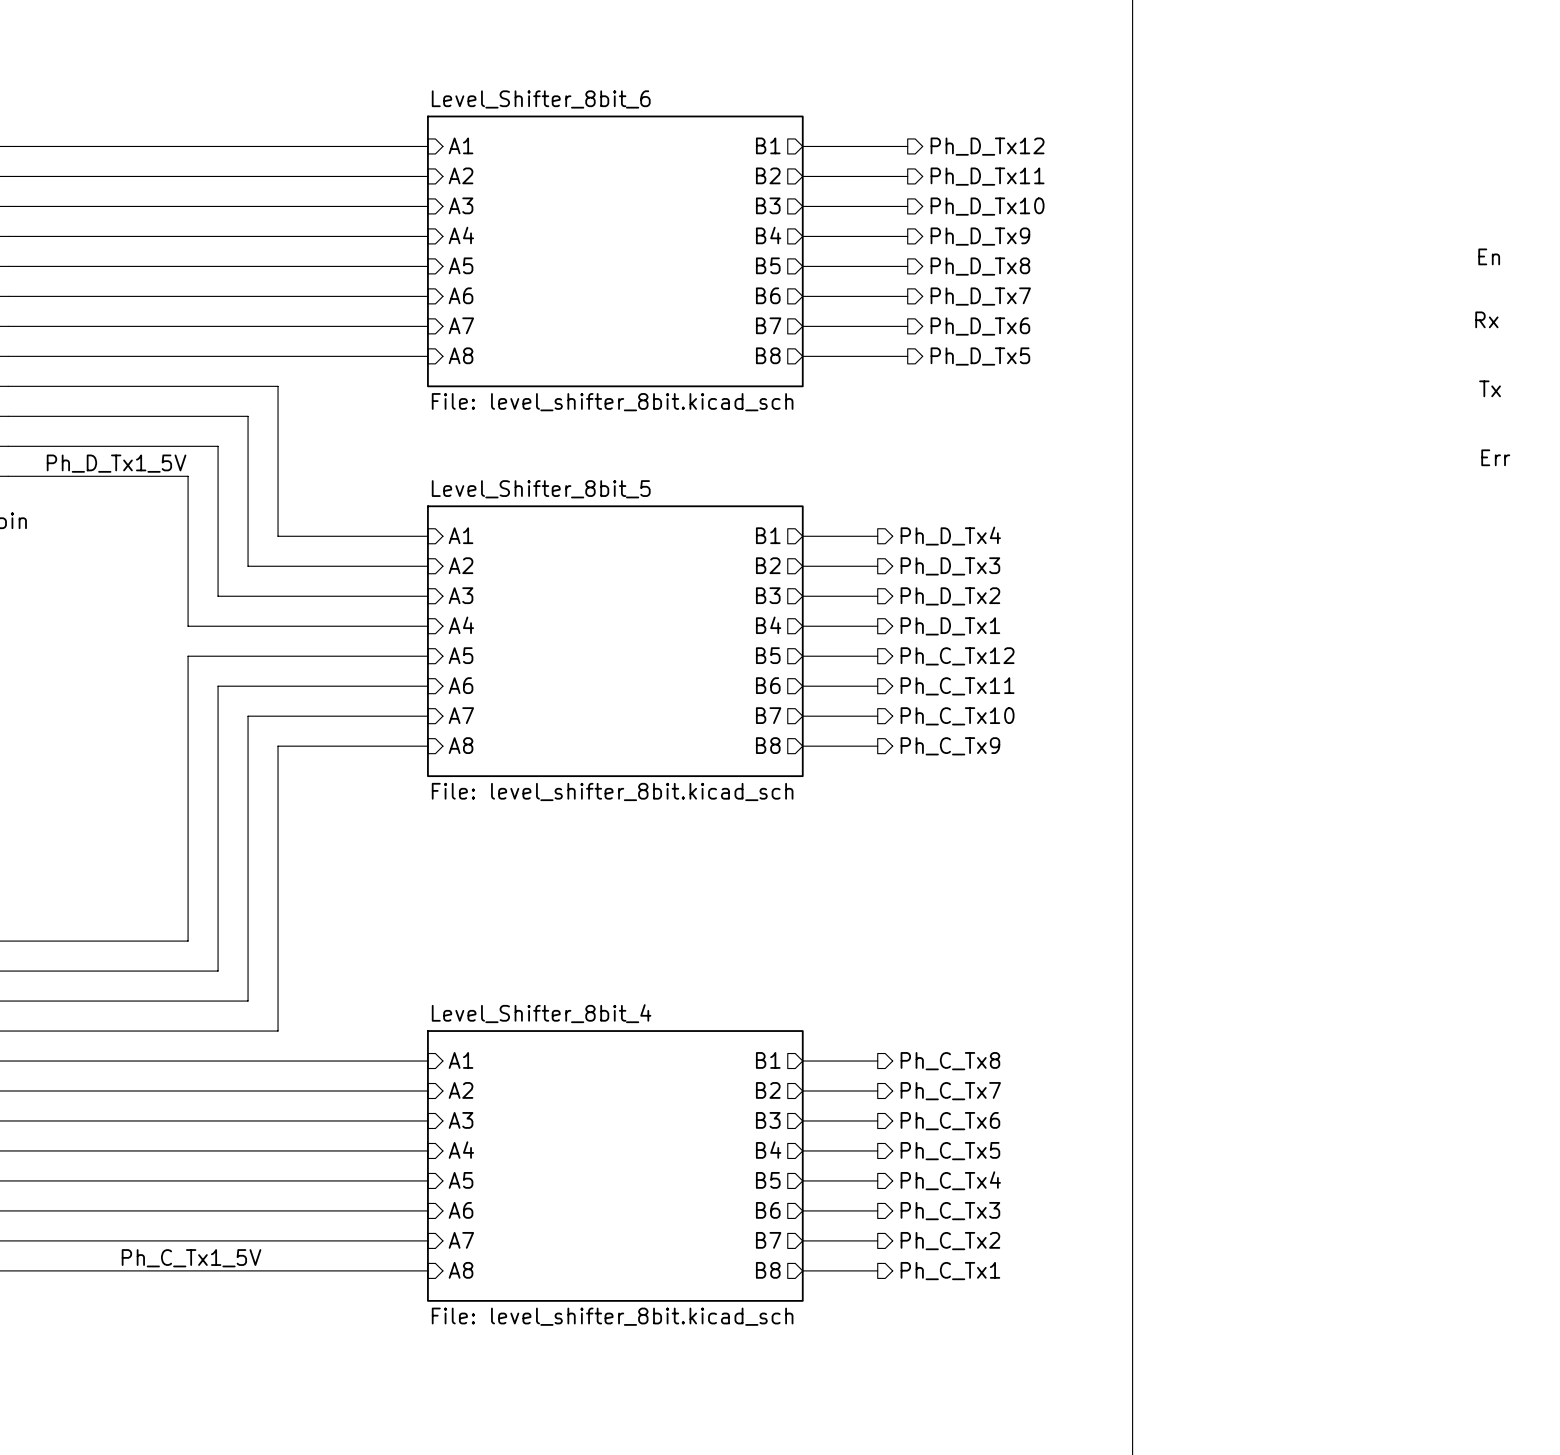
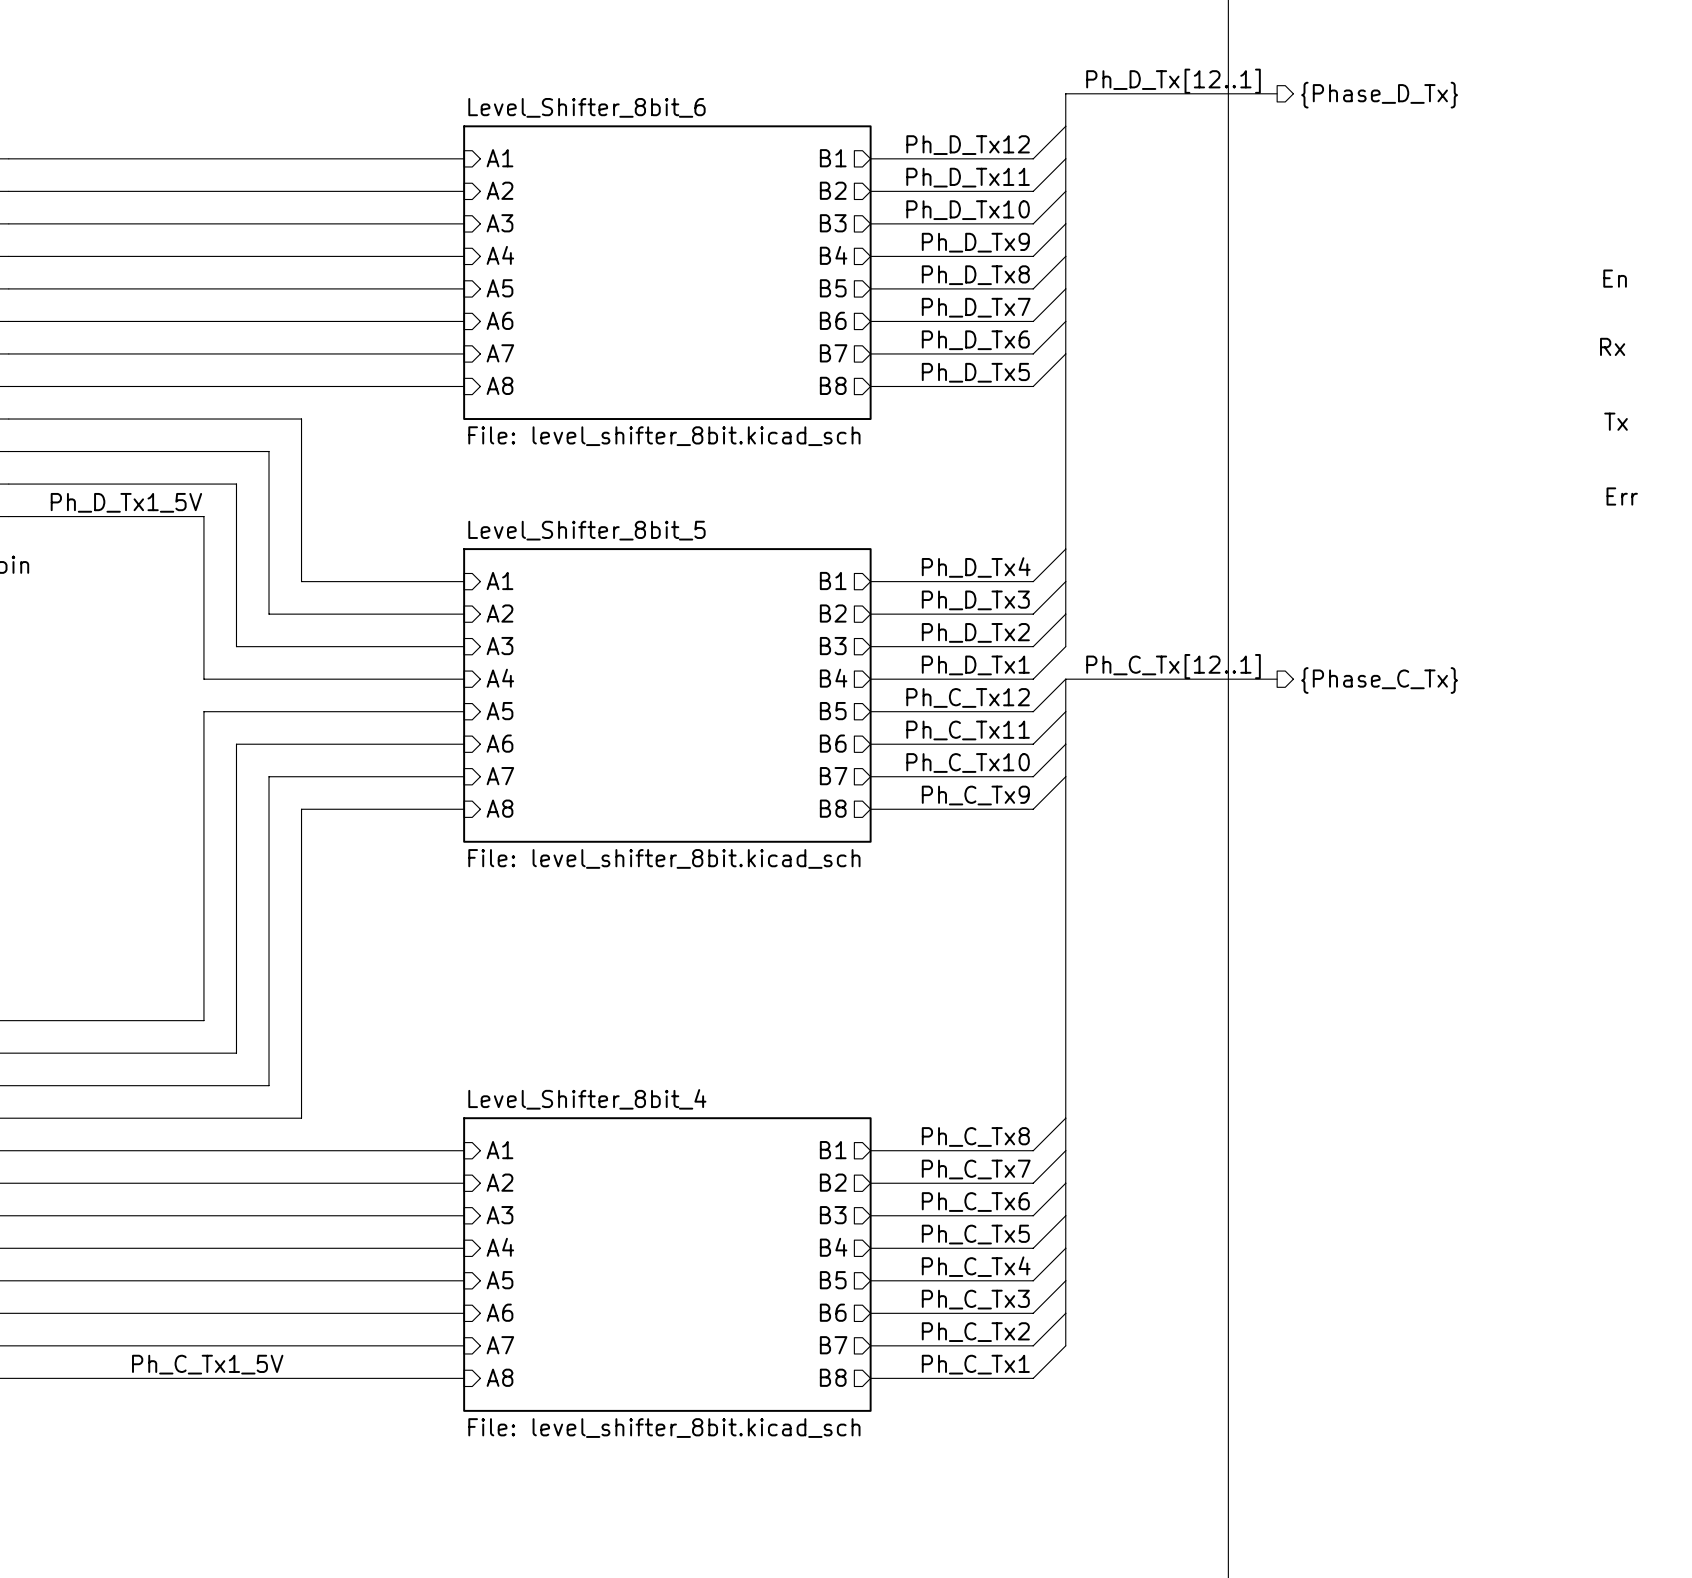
label: none -> Ph_D_Tx[12..1] (1173, 81)
bus: none -> (1277, 93) (1065, 93) (1065, 646)
hierarchical label: none -> {Phase_D_Tx} (1379, 95)
wire: none -> (1065, 126) (1033, 158) (984, 158)
label: none -> Ph_D_Tx12 (968, 145)
wire: none -> (1065, 158) (1033, 191) (984, 191)
hierarchical label: Ph_D_Tx12 (987, 146) -> none
label: none -> Ph_D_Tx11 (968, 177)
wire: none -> (1065, 191) (1033, 223) (984, 223)
hierarchical label: Ph_D_Tx11 (987, 176) -> none
label: none -> Ph_D_Tx10 (968, 210)
wire: none -> (1065, 223) (1033, 256) (984, 256)
hierarchical label: Ph_D_Tx10 (987, 206) -> none
label: none -> Ph_D_Tx9 (975, 242)
hierarchical label: Ph_D_Tx9 (980, 236) -> none
wire: none -> (1065, 256) (1033, 288) (984, 288)
label: none -> Ph_D_Tx8 (975, 275)
hierarchical label: Ph_D_Tx8 (980, 266) -> none
wire: none -> (1065, 288) (1033, 321) (984, 321)
label: none -> Ph_D_Tx7 (976, 307)
hierarchical label: Ph_D_Tx7 (980, 296) -> none
wire: none -> (1065, 321) (1033, 353) (984, 353)
label: none -> Ph_D_Tx6 (975, 340)
hierarchical label: Ph_D_Tx6 (980, 326) -> none
wire: none -> (1065, 353) (1033, 386) (984, 386)
label: none -> Ph_D_Tx5 (975, 372)
hierarchical label: Ph_D_Tx5 (980, 356) -> none
wire: none -> (1065, 549) (1033, 581) (951, 581)
label: none -> Ph_D_Tx4 (976, 567)
hierarchical label: Ph_D_Tx4 (950, 536) -> none
wire: none -> (1065, 581) (1033, 614) (951, 614)
label: none -> Ph_D_Tx3 (975, 600)
hierarchical label: Ph_D_Tx3 (950, 566) -> none
wire: none -> (1065, 614) (1033, 646) (951, 646)
label: none -> Ph_D_Tx2 (975, 632)
hierarchical label: Ph_D_Tx2 (950, 596) -> none
wire: none -> (1065, 646) (1033, 679) (951, 679)
label: none -> Ph_D_Tx1 (975, 665)
label: none -> Ph_C_Tx[12..1] (1173, 666)
hierarchical label: Ph_D_Tx1 (950, 626) -> none
wire: none -> (1065, 679) (1033, 711) (951, 711)
bus: none -> (1277, 679) (1065, 679) (1065, 1345)
hierarchical label: none -> {Phase_C_Tx} (1379, 680)
label: none -> Ph_C_Tx12 (968, 697)
hierarchical label: Ph_C_Tx12 (957, 656) -> none
wire: none -> (1065, 711) (1033, 744) (951, 744)
label: none -> Ph_C_Tx11 (968, 730)
hierarchical label: Ph_C_Tx11 (957, 686) -> none
wire: none -> (1065, 744) (1033, 776) (951, 776)
label: none -> Ph_C_Tx10 (968, 763)
hierarchical label: Ph_C_Tx10 (957, 716) -> none
wire: none -> (1065, 776) (1033, 809) (951, 809)
label: none -> Ph_C_Tx9 (975, 795)
hierarchical label: Ph_C_Tx9 (950, 746) -> none
wire: none -> (1065, 1118) (1033, 1150) (951, 1150)
label: none -> Ph_C_Tx8 (975, 1136)
hierarchical label: Ph_C_Tx8 (950, 1061) -> none
wire: none -> (1065, 1150) (1033, 1183) (951, 1183)
label: none -> Ph_C_Tx7 (976, 1169)
hierarchical label: Ph_C_Tx7 (950, 1091) -> none
wire: none -> (1065, 1183) (1033, 1215) (951, 1215)
label: none -> Ph_C_Tx6 (975, 1202)
wire: none -> (1065, 1215) (1033, 1248) (951, 1248)
hierarchical label: Ph_C_Tx6 (950, 1121) -> none
label: none -> Ph_C_Tx5 (975, 1234)
wire: none -> (1065, 1248) (1033, 1280) (951, 1280)
hierarchical label: Ph_C_Tx5 (950, 1151) -> none
label: none -> Ph_C_Tx4 (976, 1266)
hierarchical label: Ph_C_Tx4 (950, 1180) -> none
wire: none -> (1065, 1280) (1033, 1313) (951, 1313)
label: none -> Ph_C_Tx3 (975, 1299)
wire: none -> (1065, 1313) (1033, 1345) (951, 1345)
hierarchical label: Ph_C_Tx3 (950, 1211) -> none
label: none -> Ph_C_Tx2 (975, 1332)
wire: none -> (1065, 1345) (1033, 1378) (951, 1378)
hierarchical label: Ph_C_Tx2 (950, 1241) -> none
label: none -> Ph_C_Tx1 (975, 1364)
hierarchical label: Ph_C_Tx1 (950, 1271) -> none

